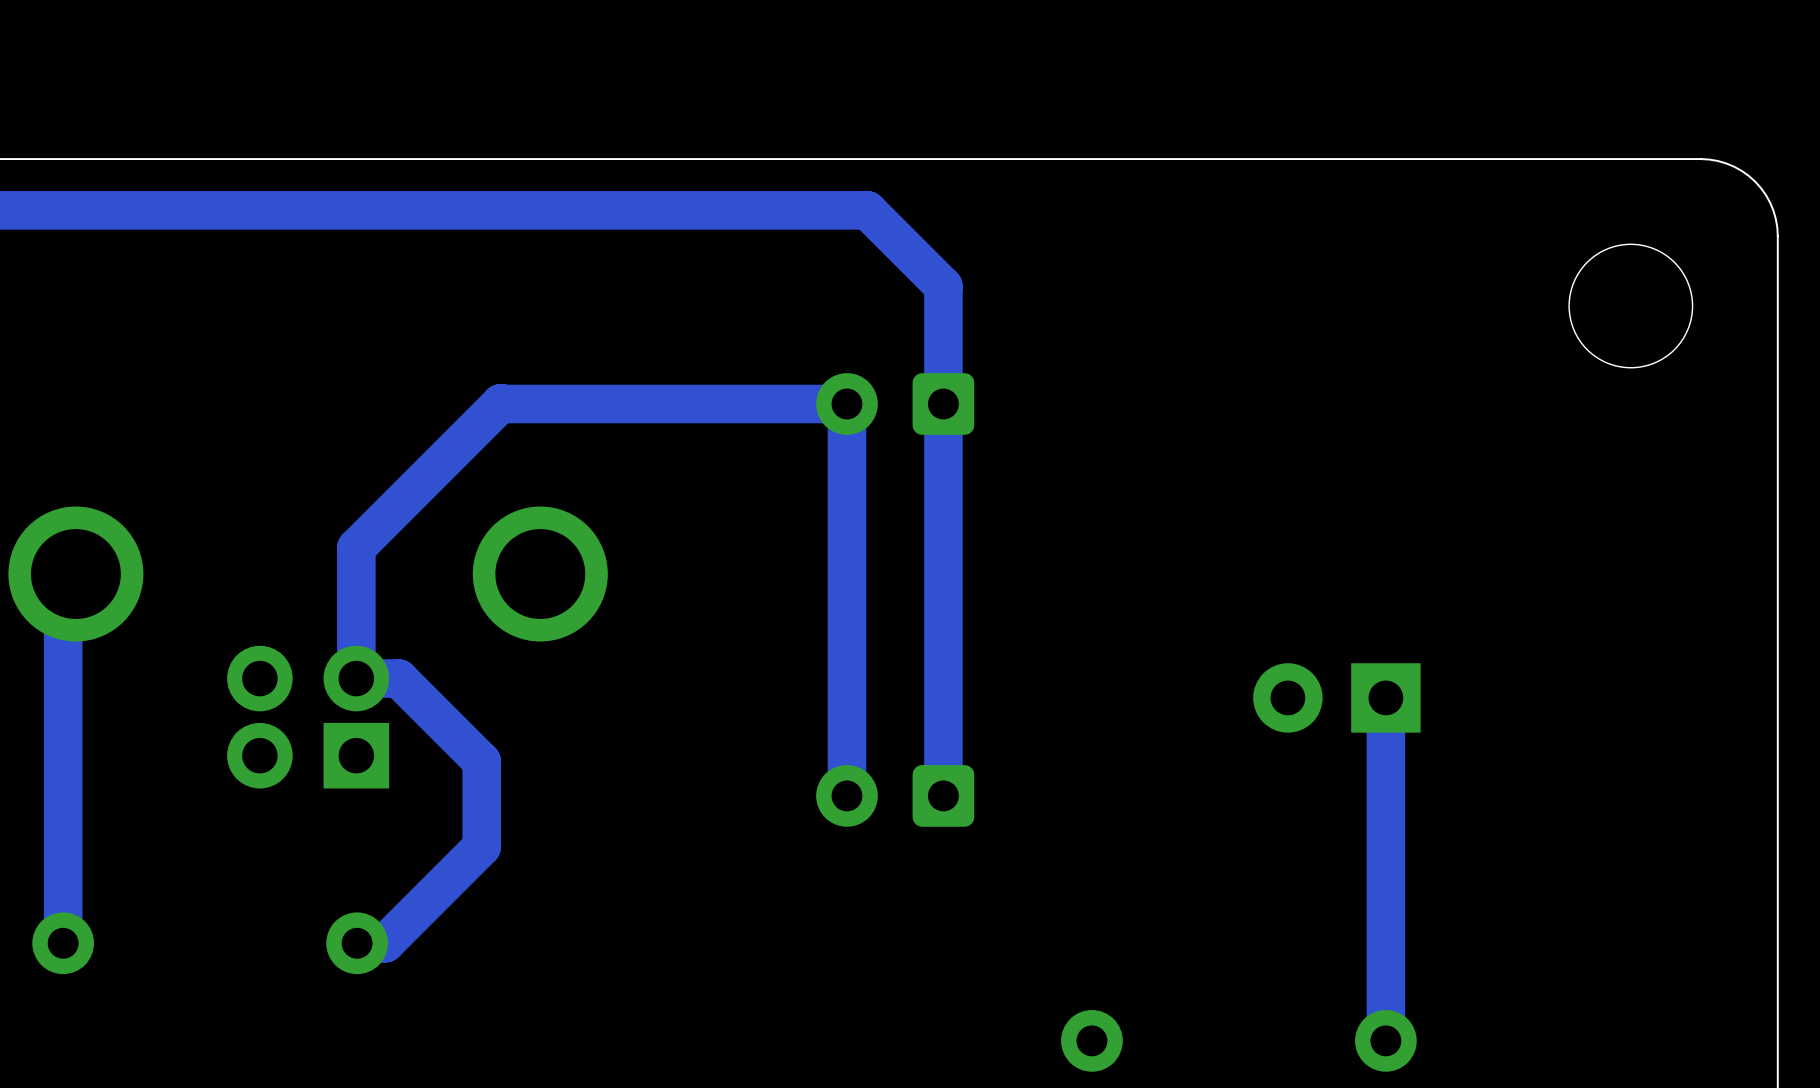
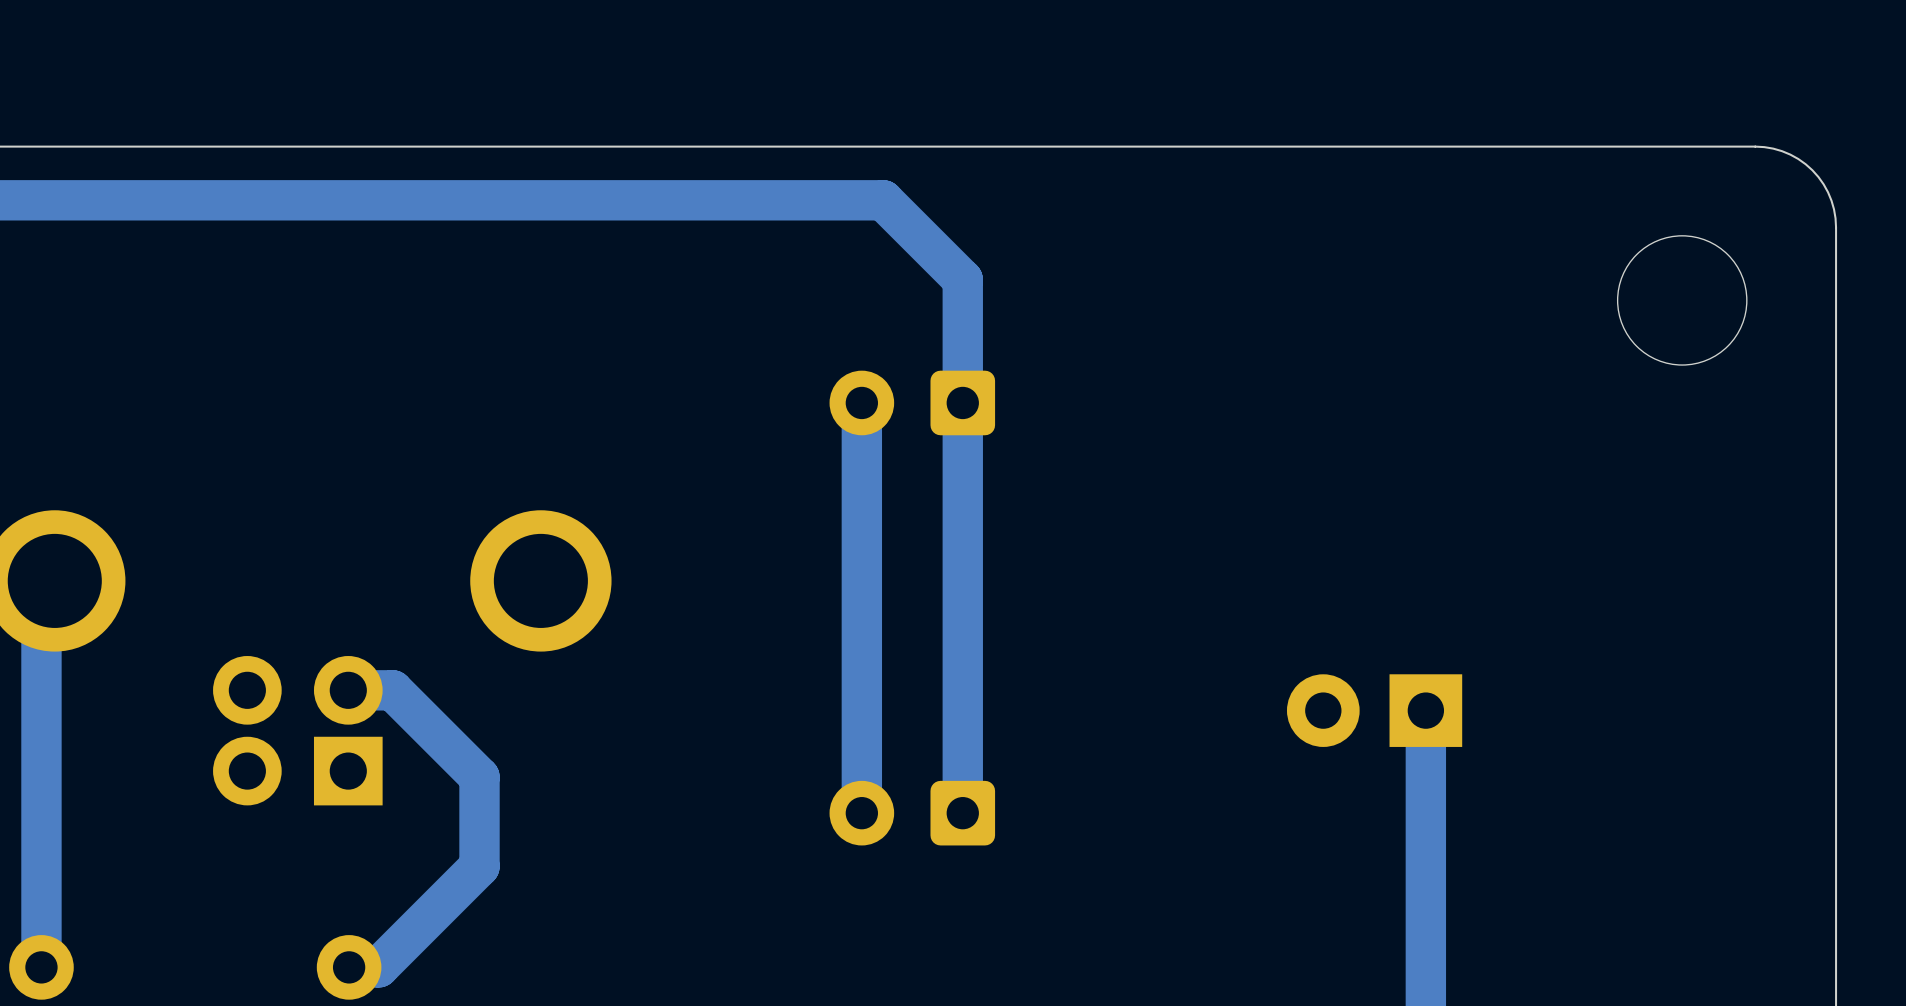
track: (847, 404) (500, 403) (356, 547) (356, 678) -> none

